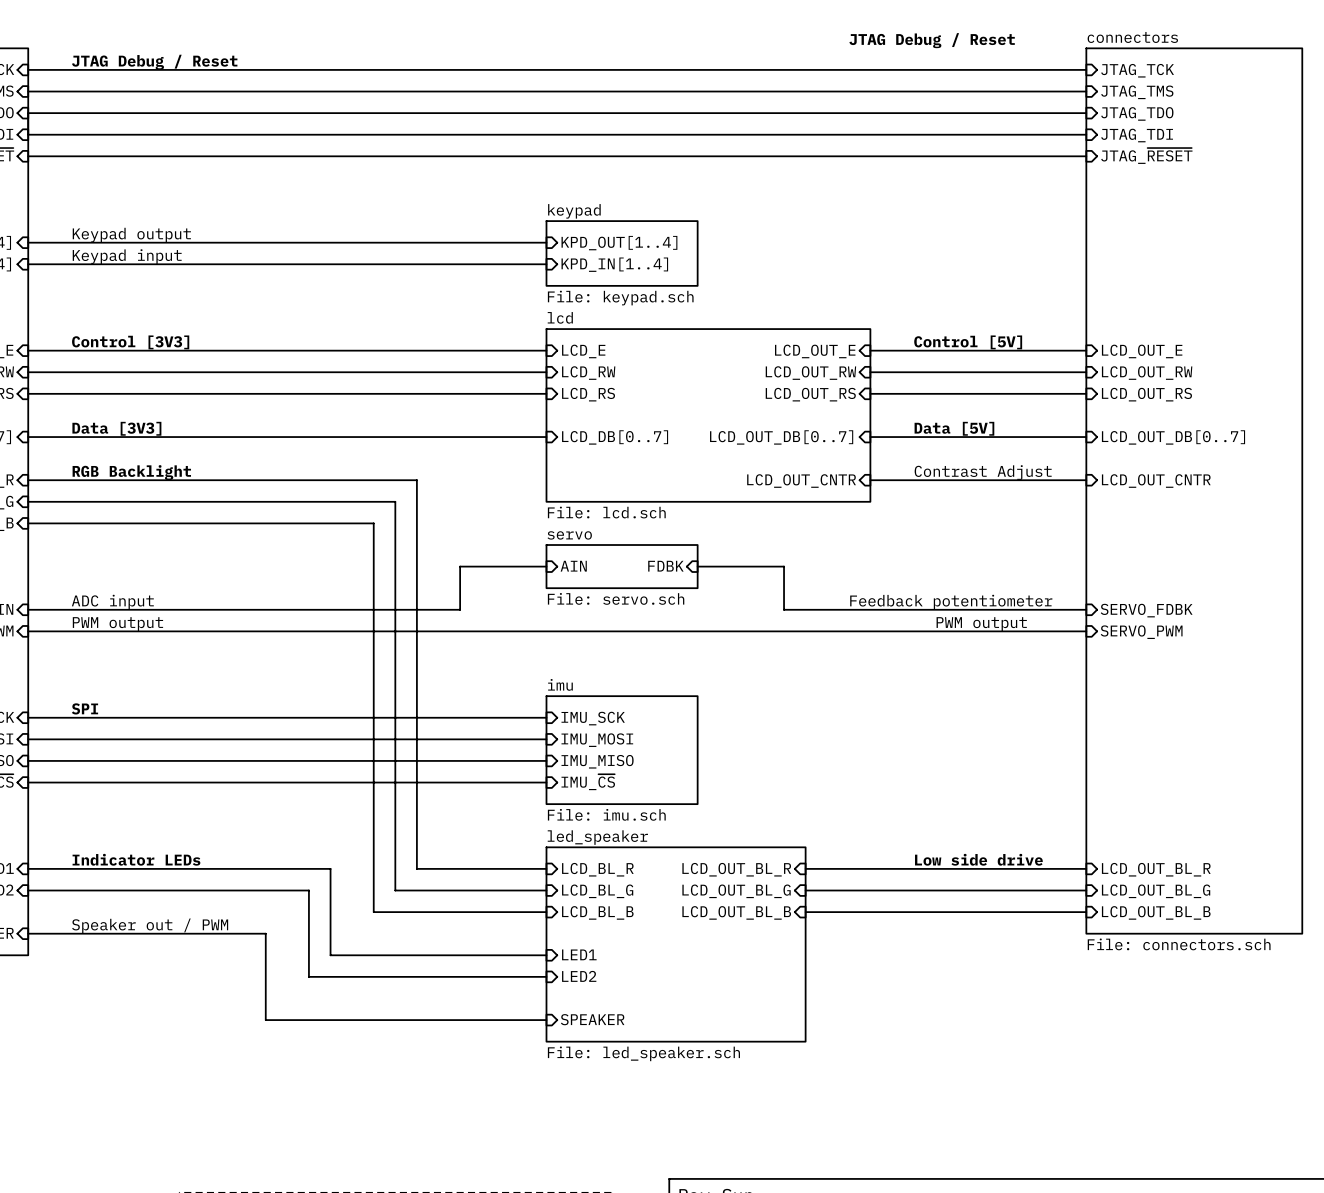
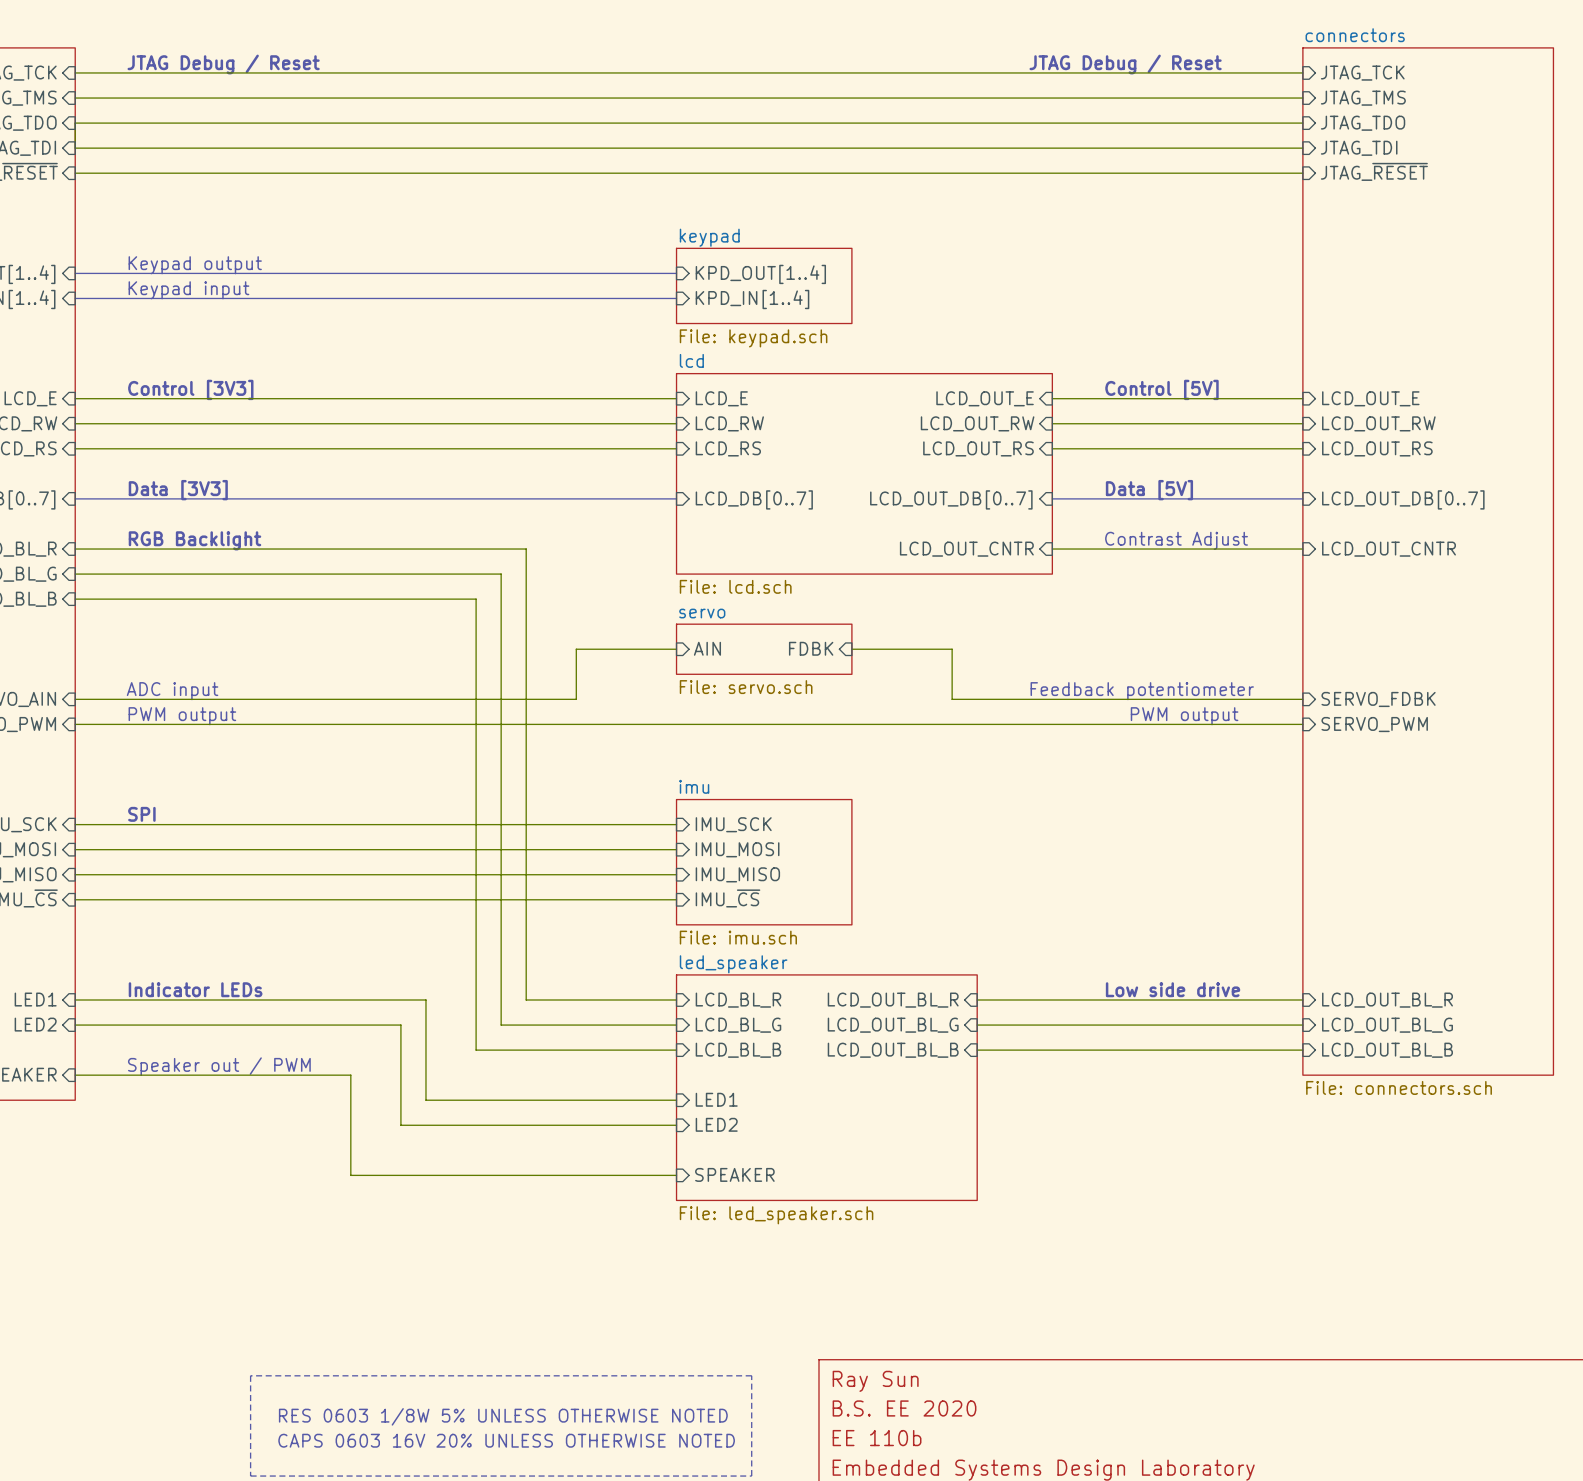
text position: JTAG Debug / Reset (932, 40) -> JTAG Debug / Reset (1125, 64)

